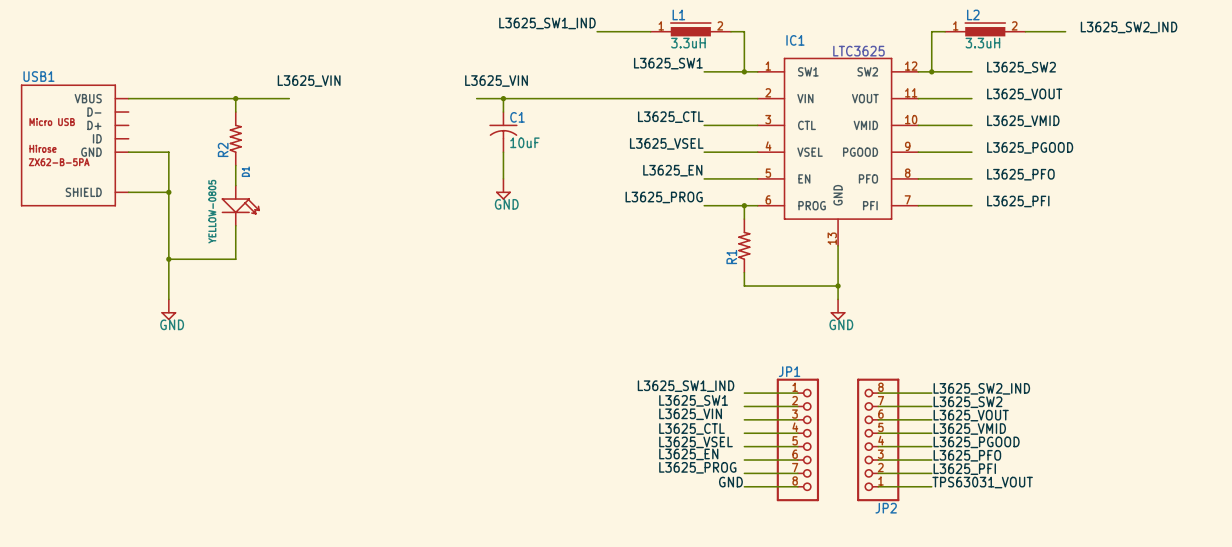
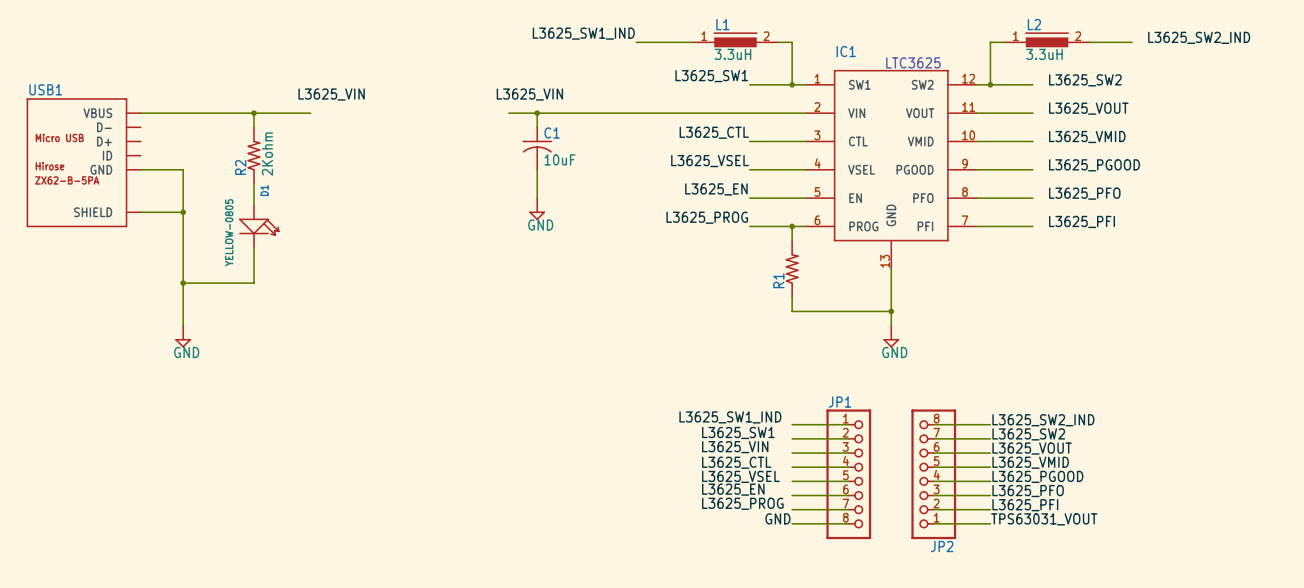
R2 value: none -> 2Kohm (267, 154)

